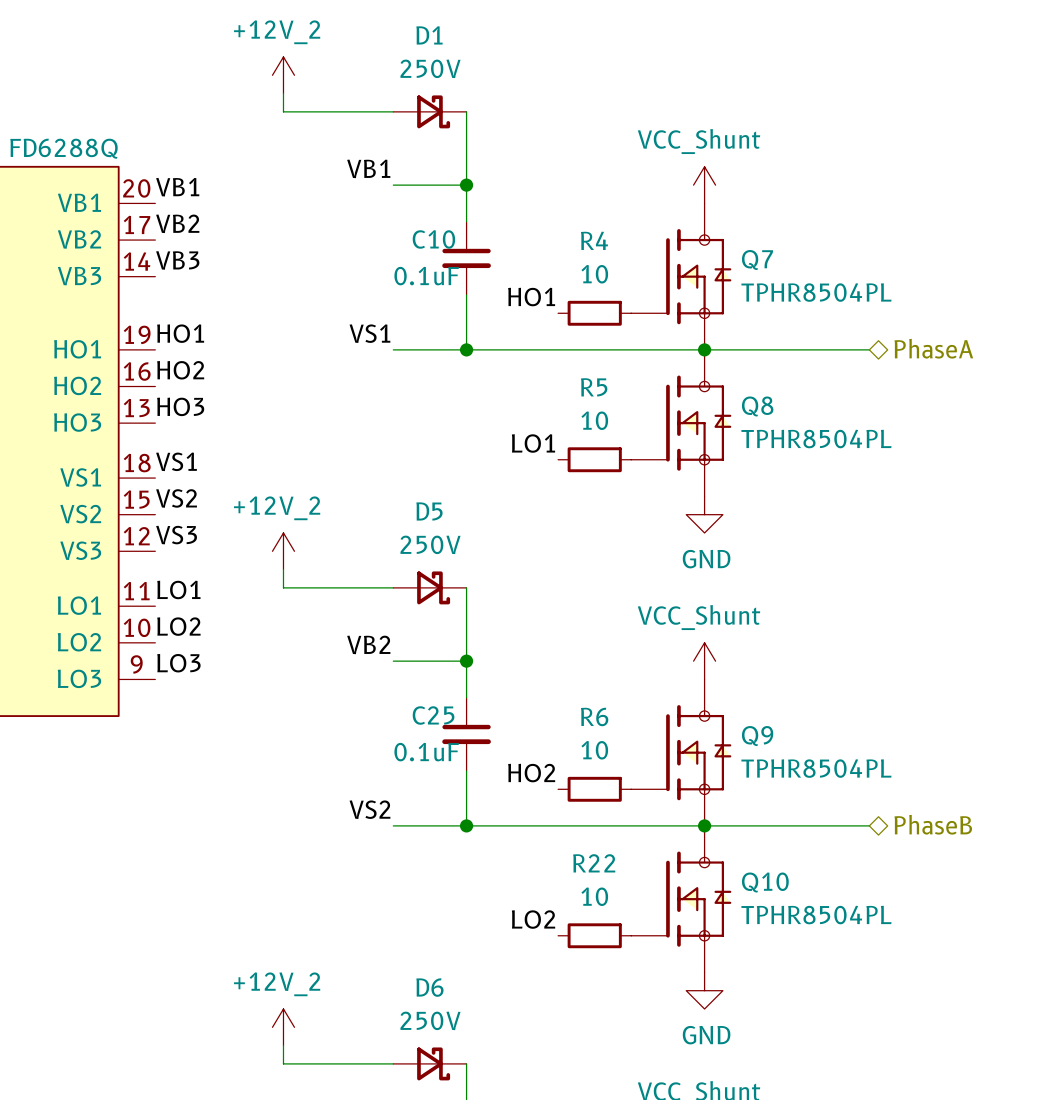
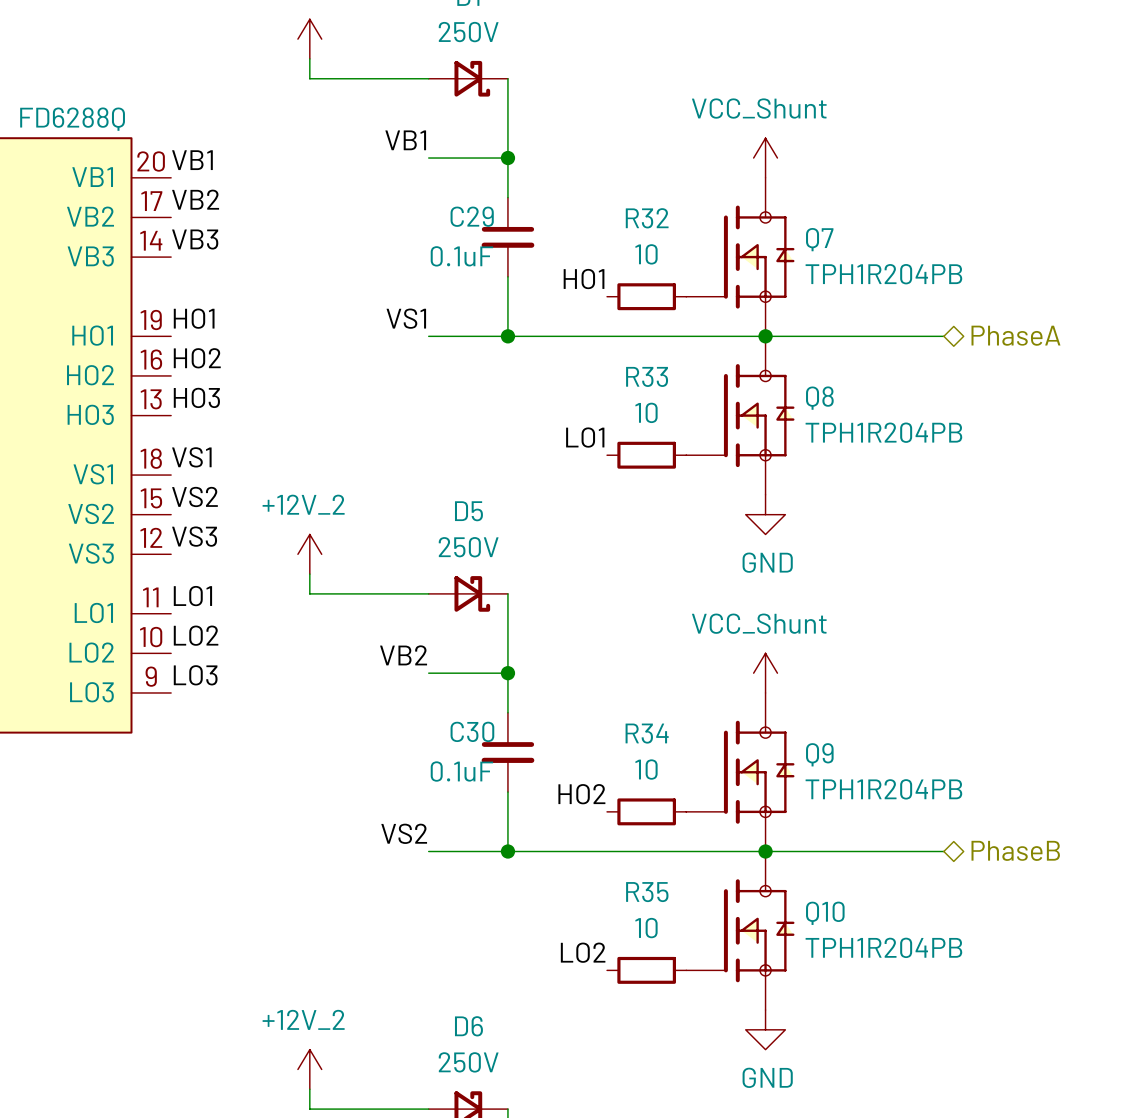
C10 name: C10 (433, 239) -> C29 (472, 216)
R4 name: R4 (594, 240) -> R32 (647, 218)
Q7 value: TPHR8504PL (816, 292) -> TPH1R204PB (883, 274)
R5 name: R5 (594, 387) -> R33 (647, 376)
Q8 value: TPHR8504PL (816, 439) -> TPH1R204PB (883, 432)
C25 name: C25 (433, 715) -> C30 (472, 731)
R6 name: R6 (594, 716) -> R34 (647, 733)
Q9 value: TPHR8504PL (816, 768) -> TPH1R204PB (883, 789)
R22 name: R22 (594, 863) -> R35 (647, 892)
Q10 value: TPHR8504PL (816, 915) -> TPH1R204PB (883, 947)

